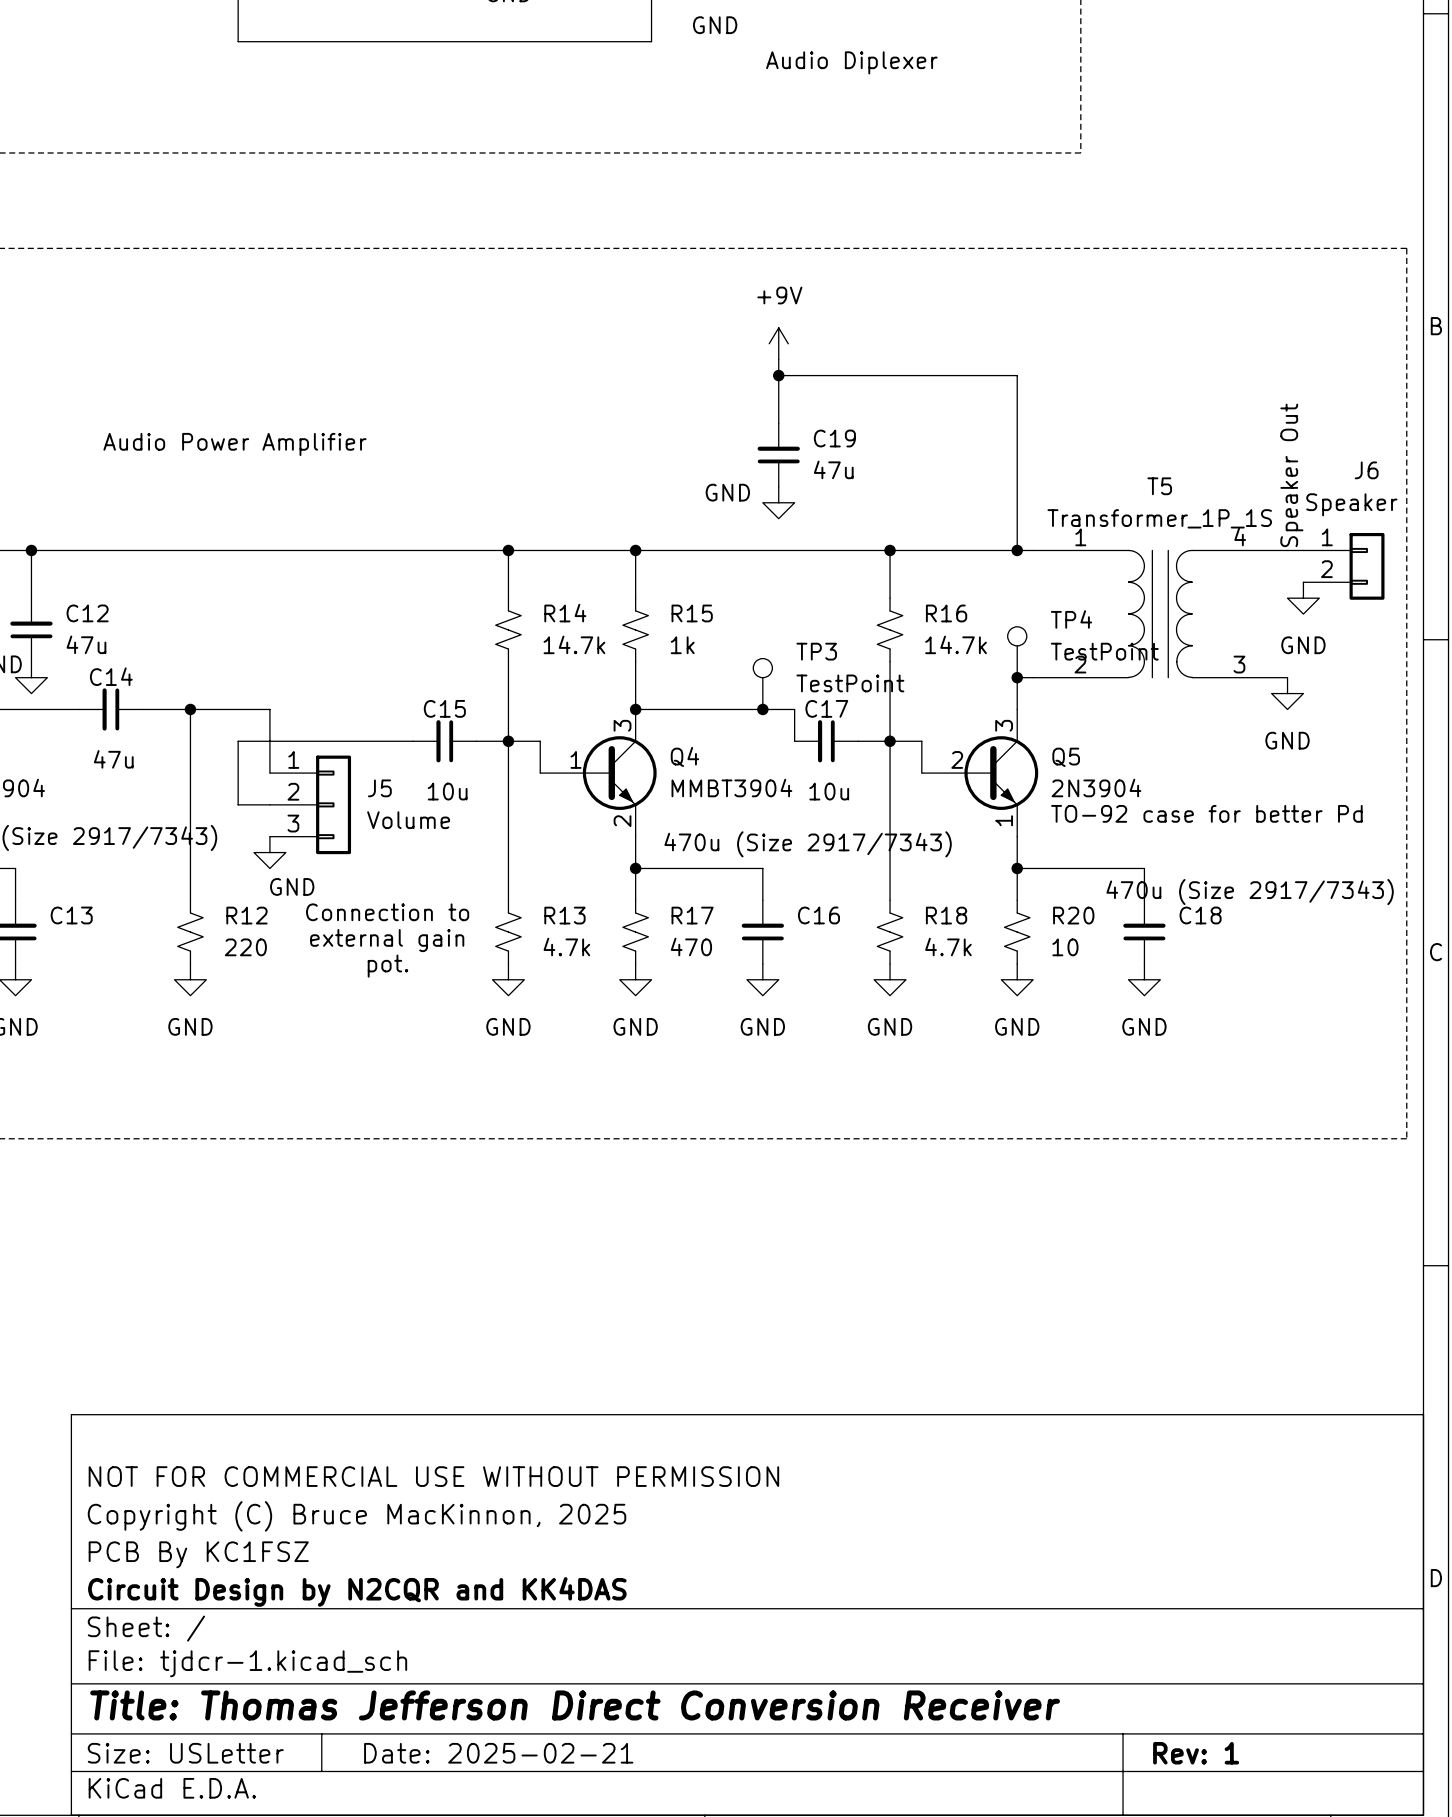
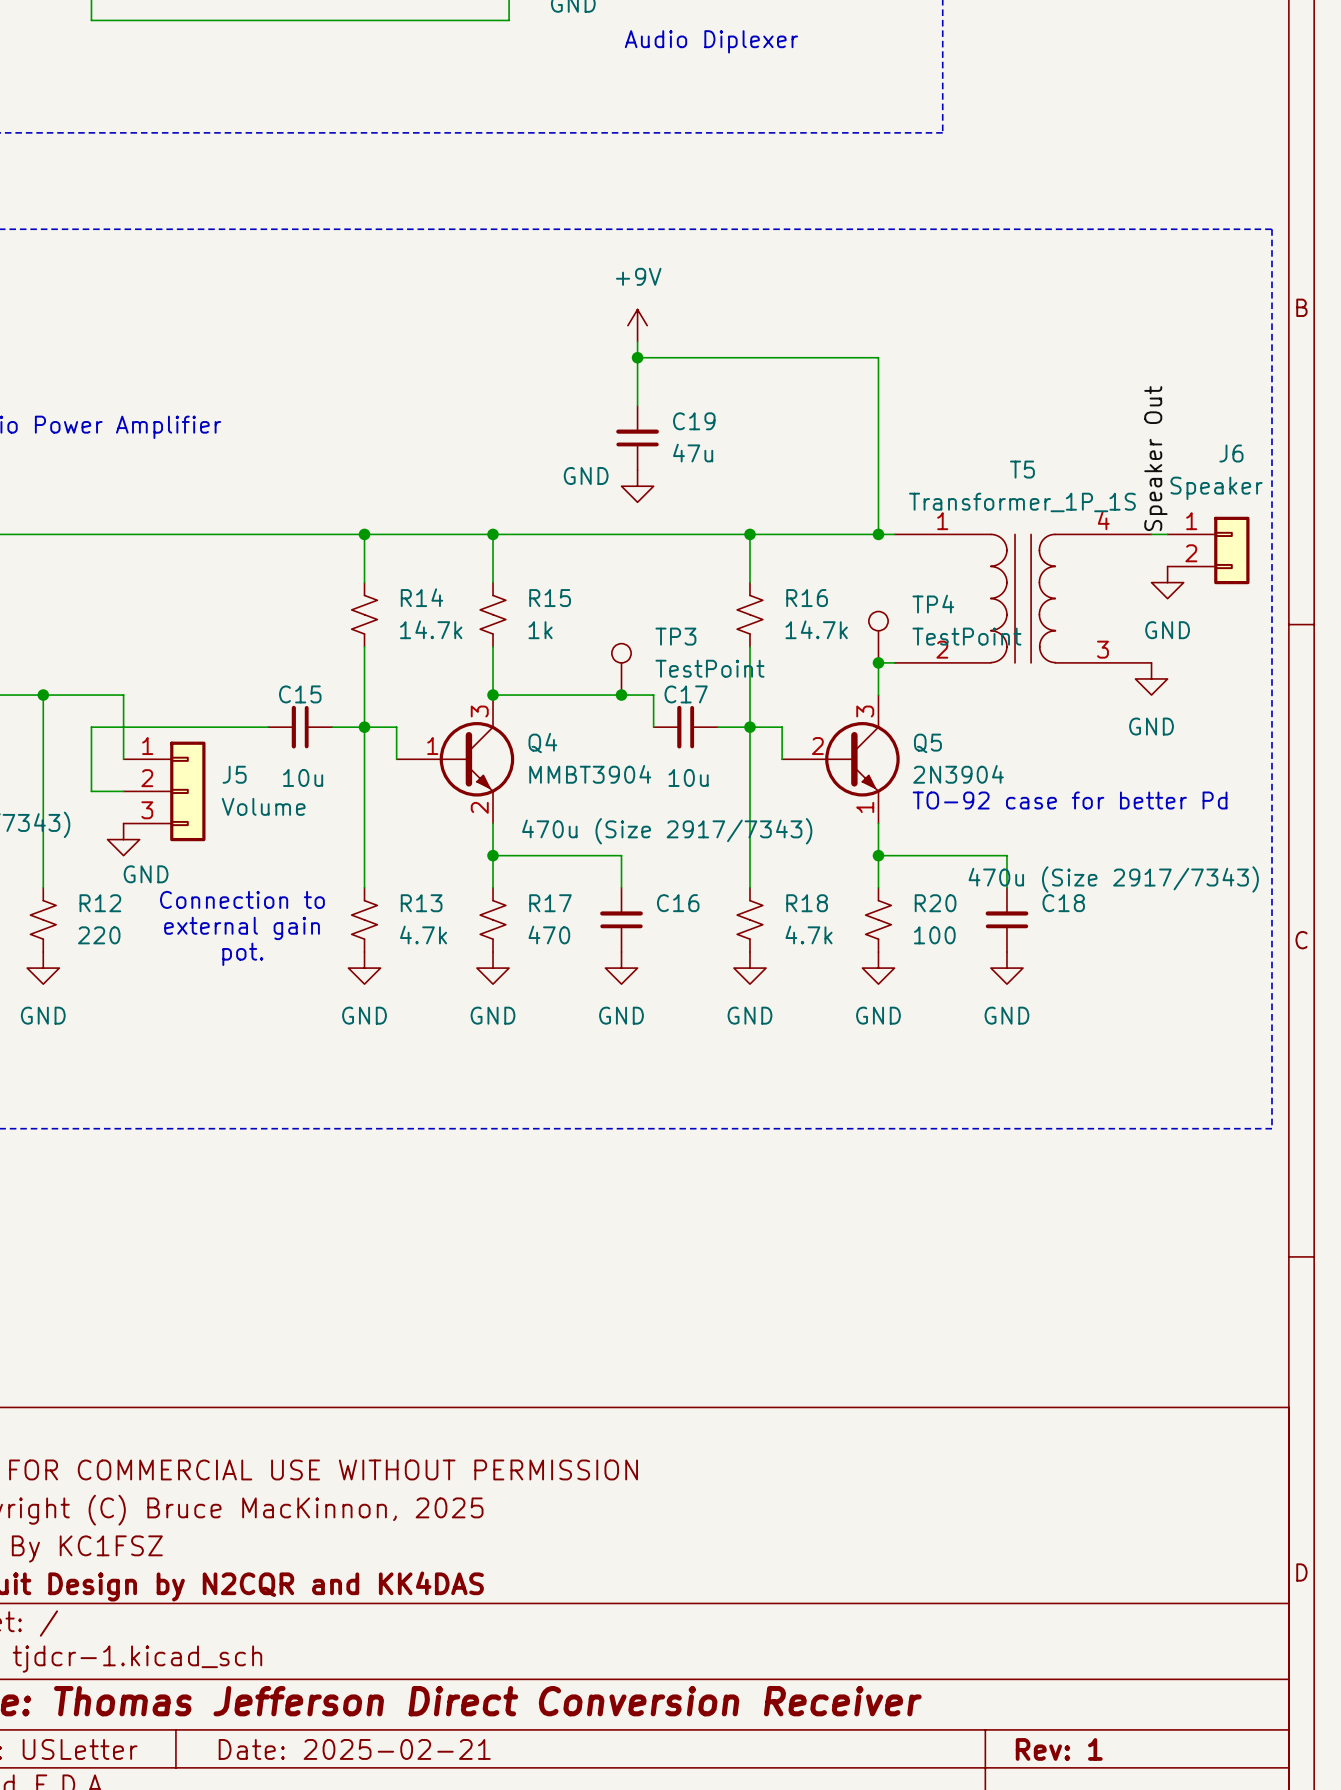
R20 value: 10 (1065, 947) -> 100 (934, 935)

